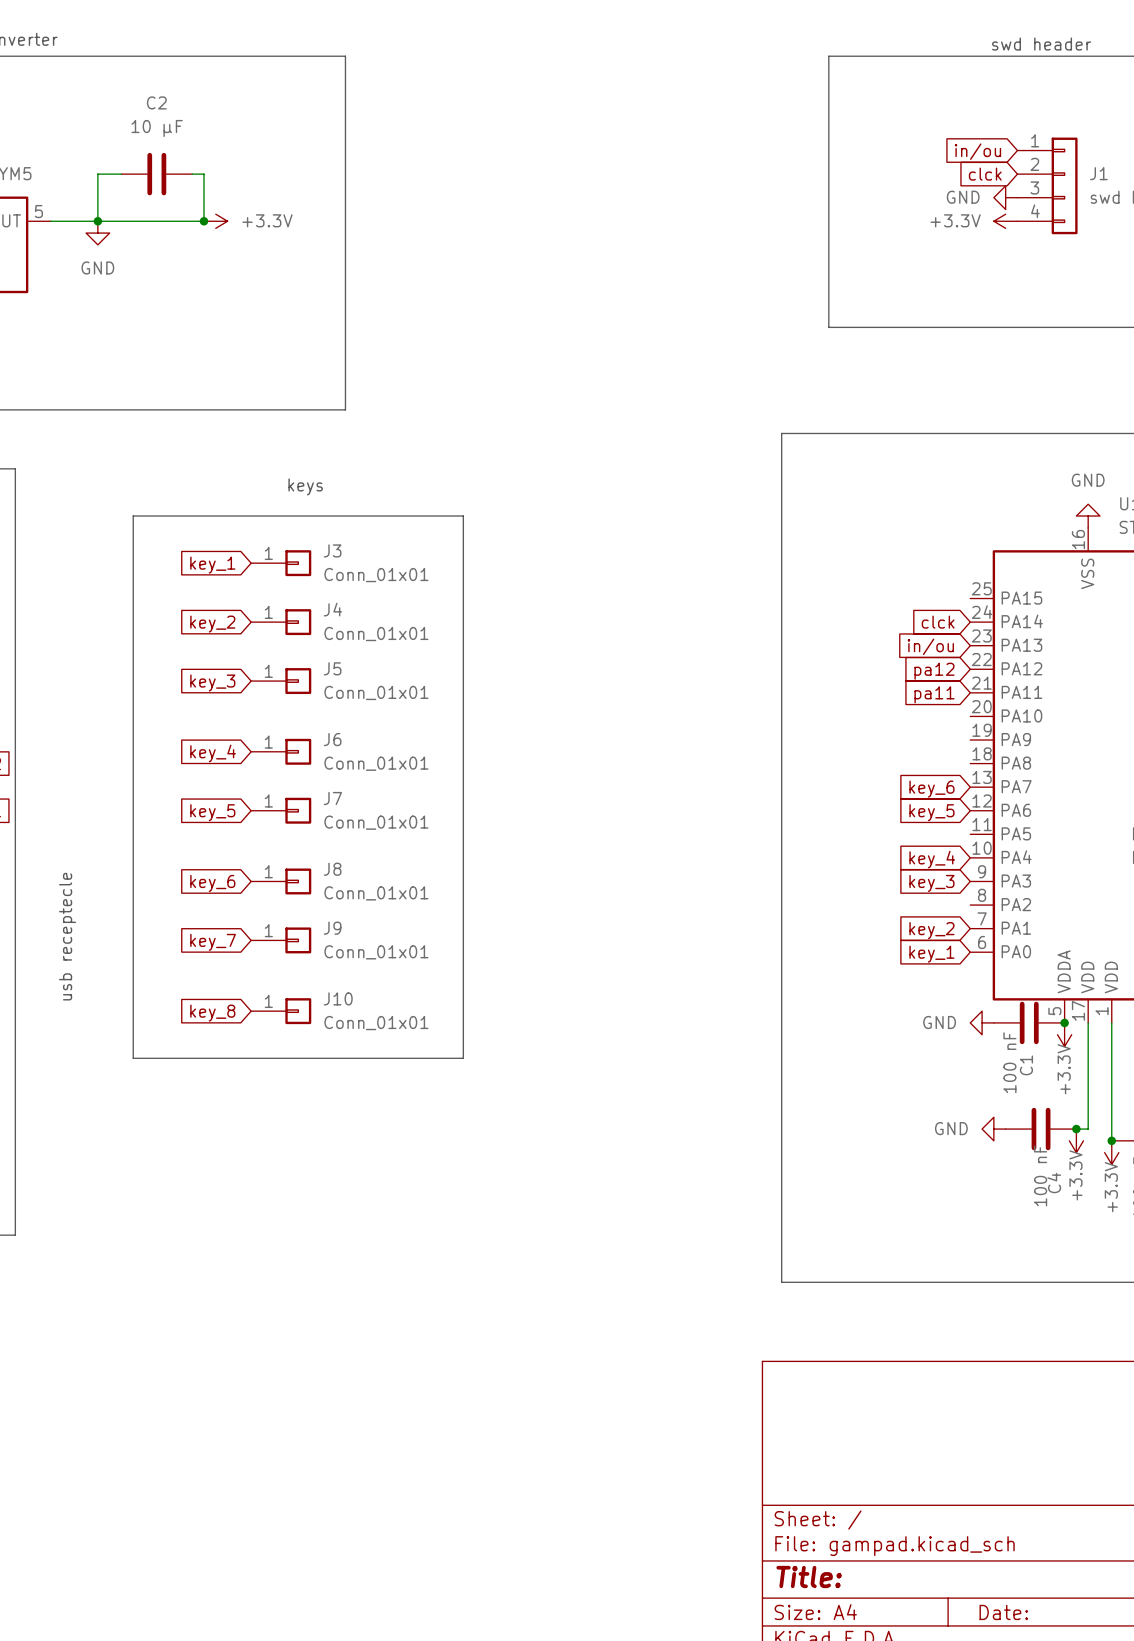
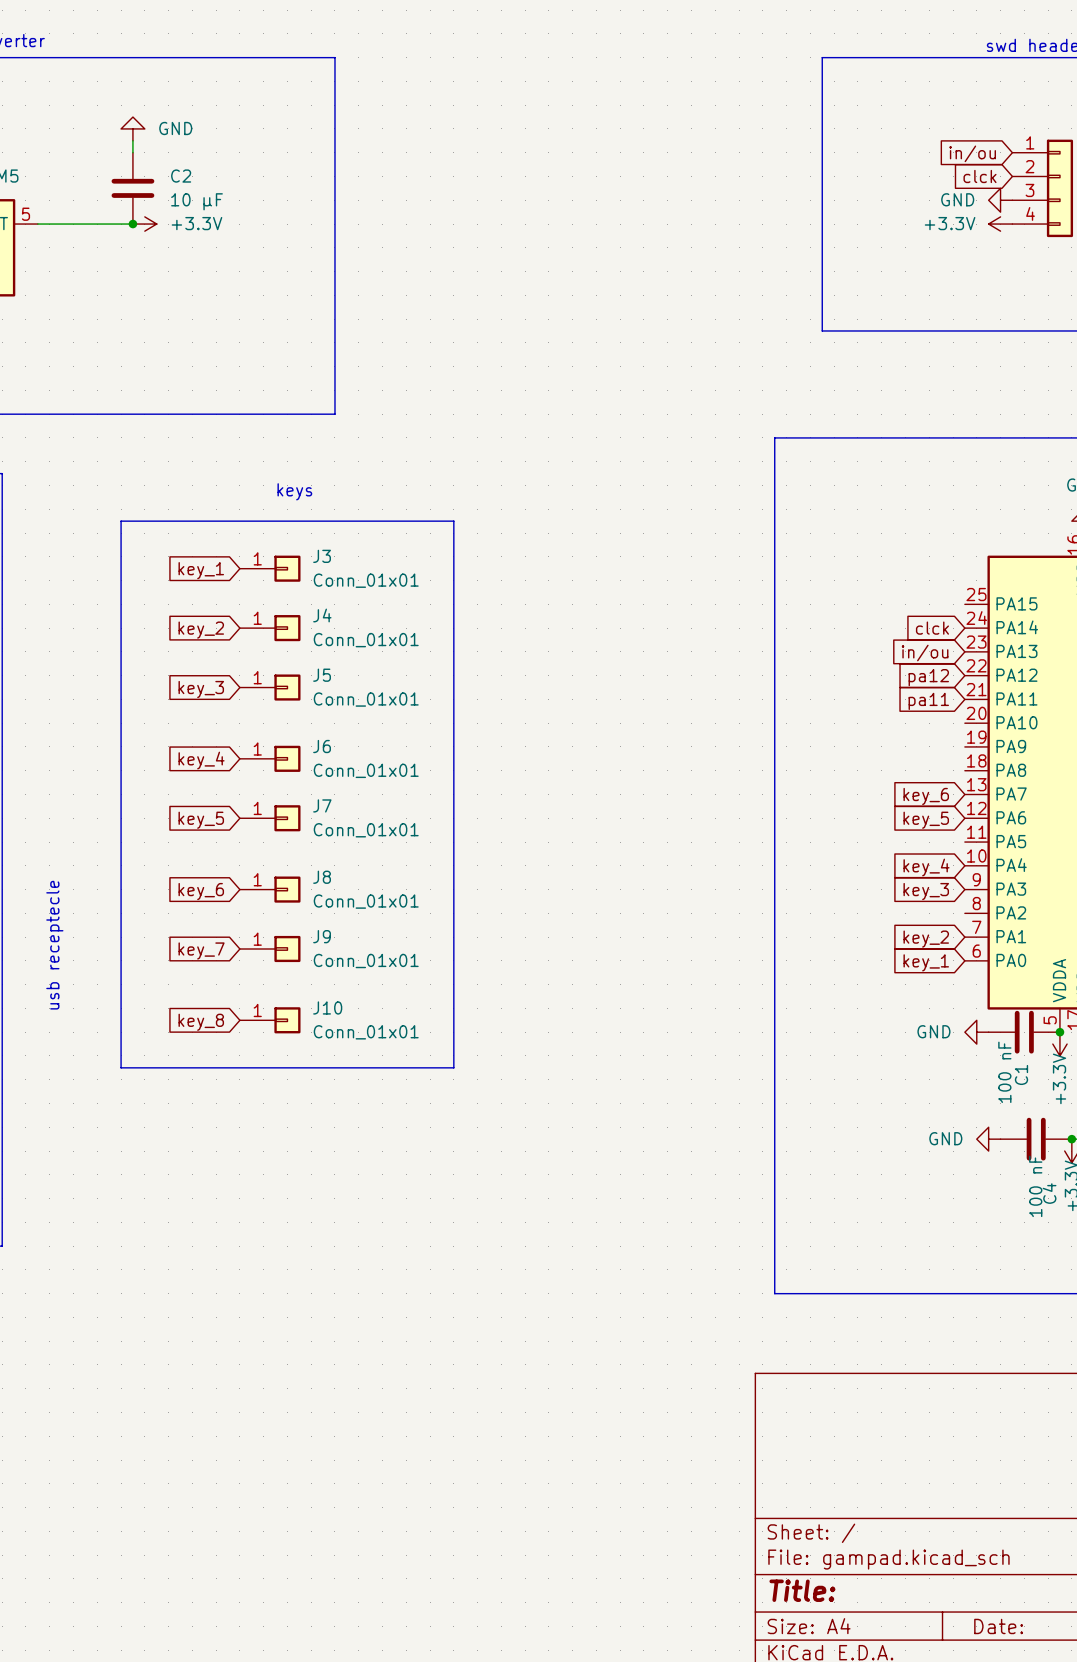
C2 name position: C2 (156, 102) -> C2 (181, 176)
C2 value position: 10 µF (157, 128) -> 10 µF (196, 201)
wire: none -> (132, 140) (132, 152)
wire: (121, 174) (97, 174) (97, 221) -> none
C2 rotation: 0° (156, 174) -> 90° clockwise (132, 188)
wire: (192, 174) (203, 174) (203, 221) (145, 221) -> none
junction: (97, 221) -> none
junction: none -> (132, 224)
junction: (203, 221) -> none
power symbol position: +3.3V (215, 221) -> +3.3V (144, 224)
power symbol rotation: 0° (97, 233) -> 180° (132, 128)
power symbol position: GND (97, 233) -> GND (132, 128)
power symbol text position: GND (97, 267) -> GND (175, 128)

